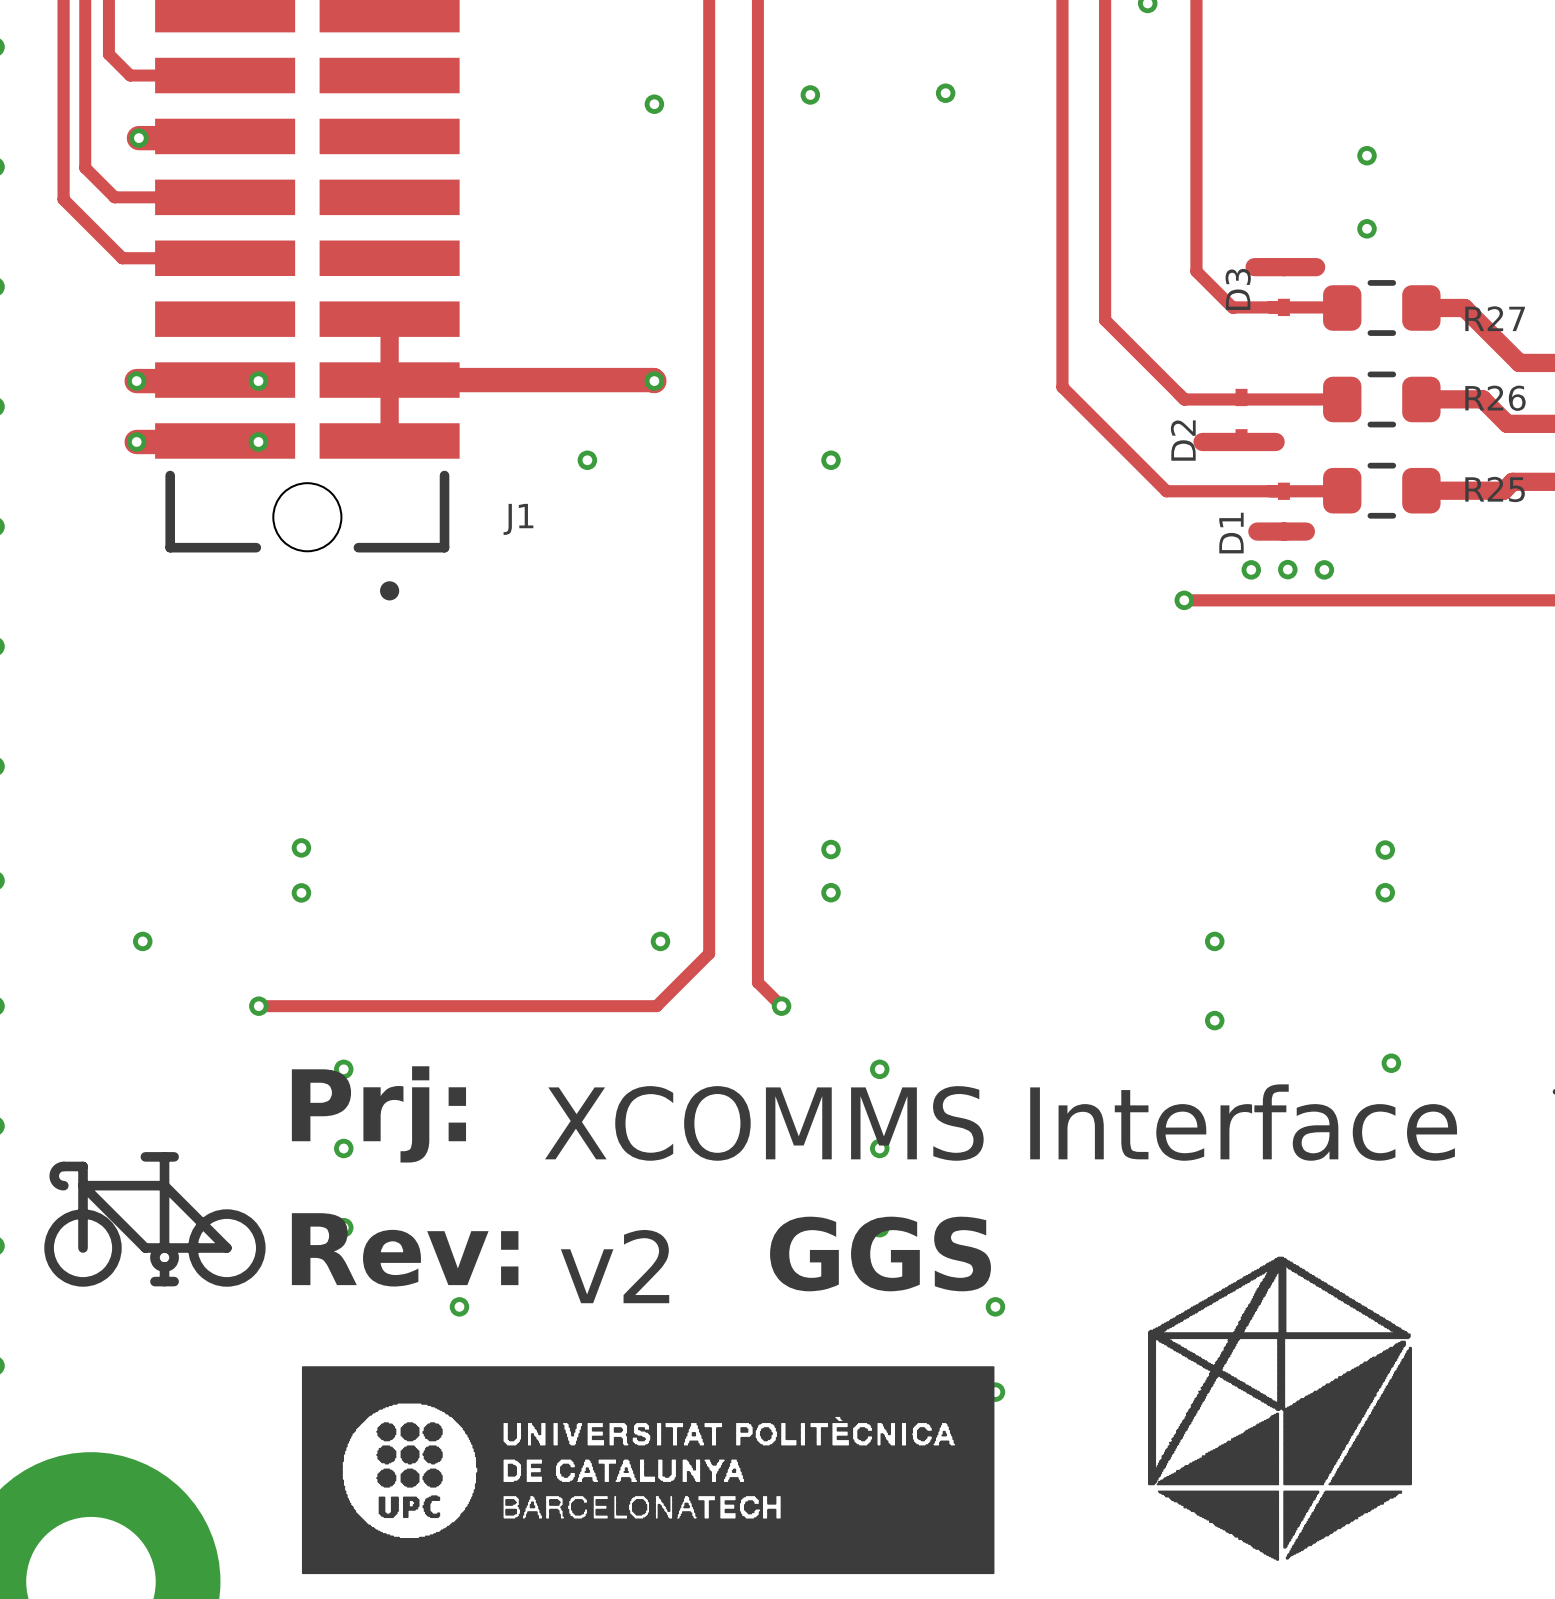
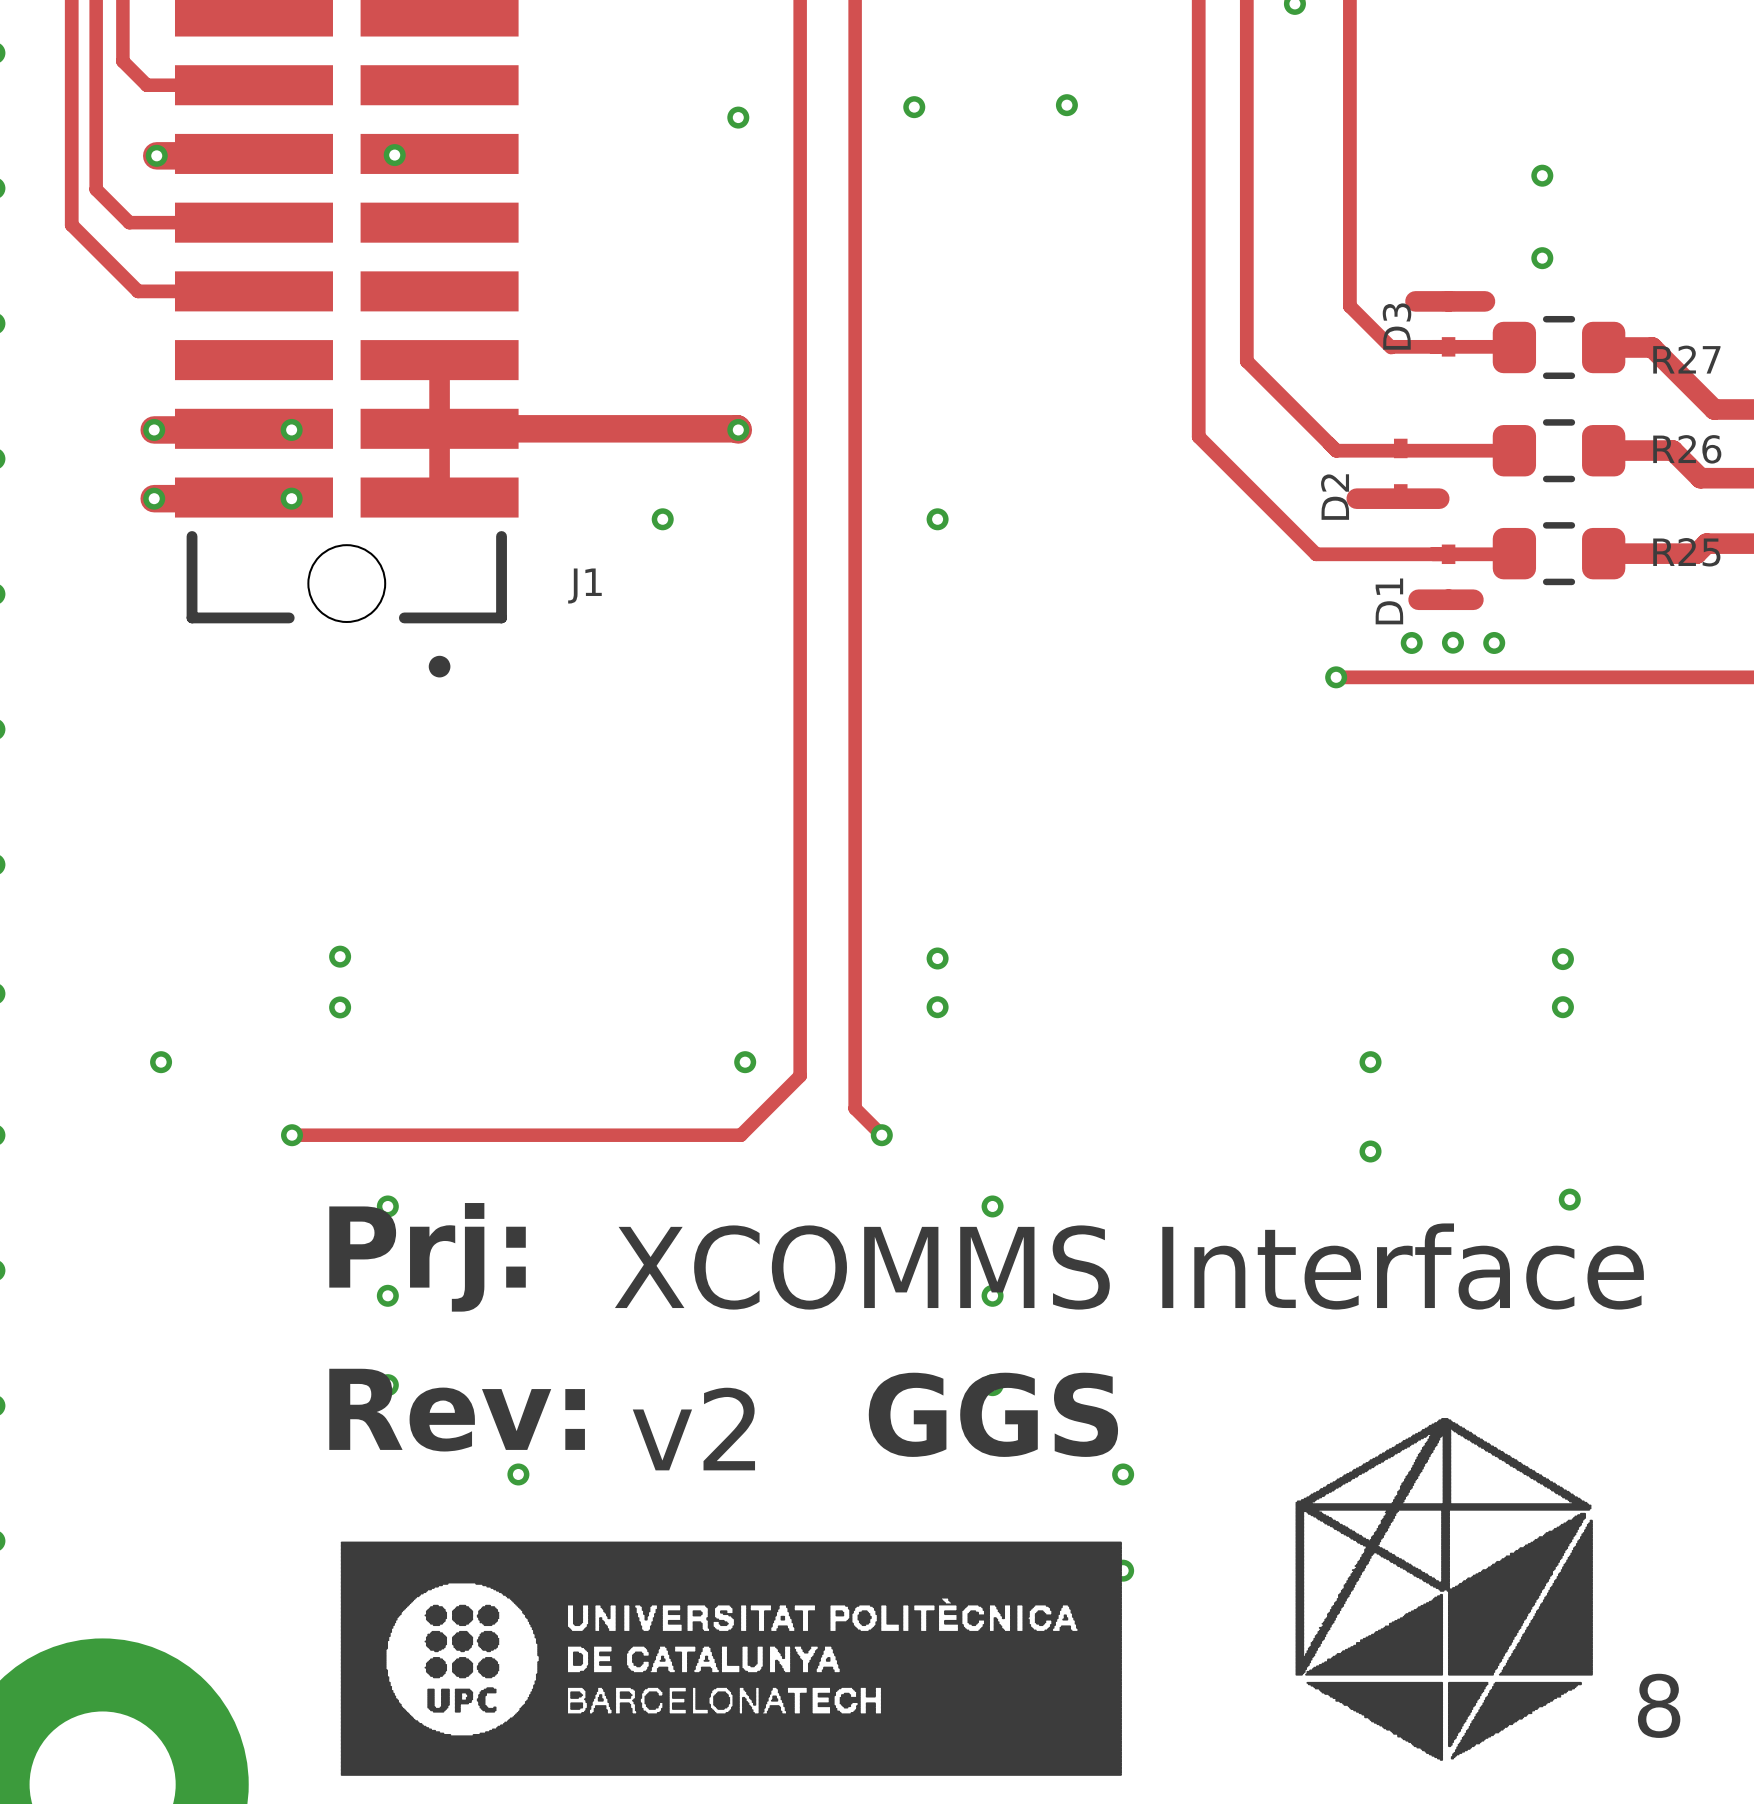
via: none -> (394, 155)
drawing: [44, 1152, 266, 1287] -> none
text: none -> 8 (1659, 1705)

